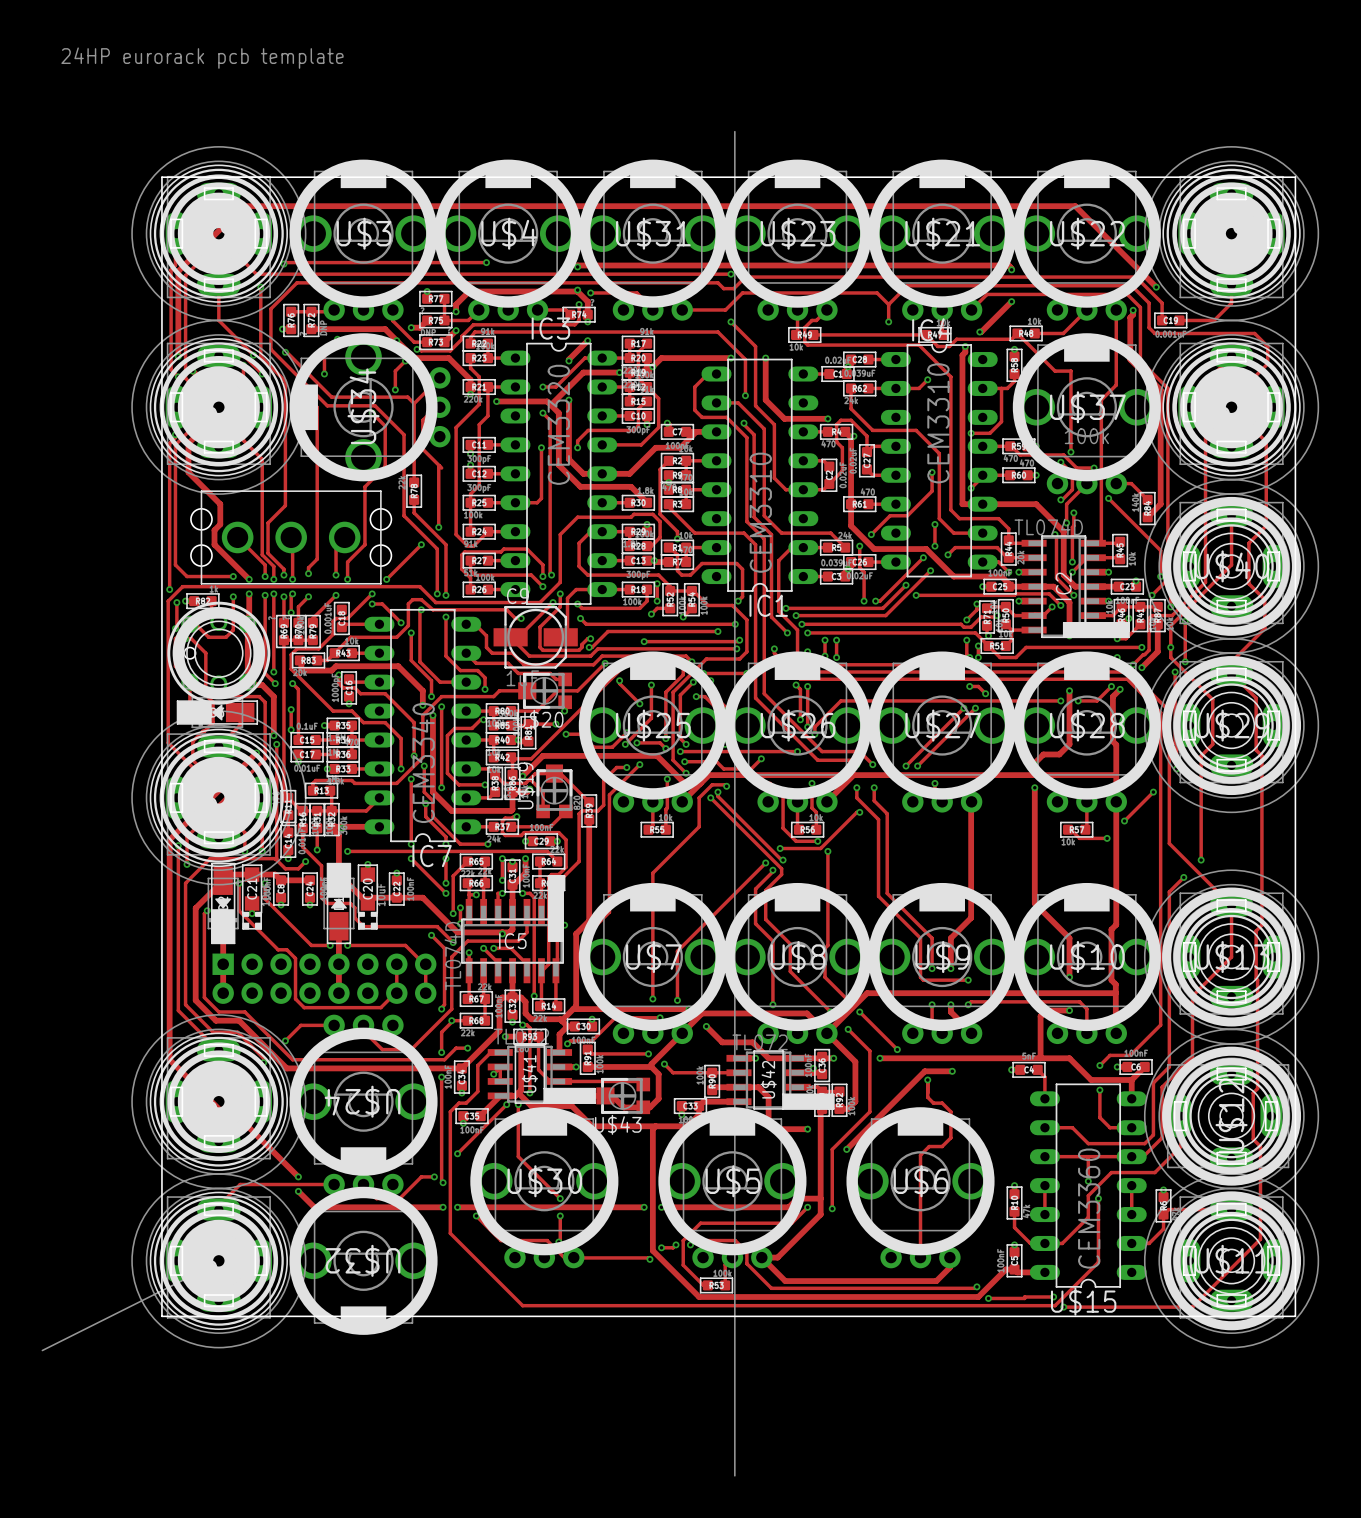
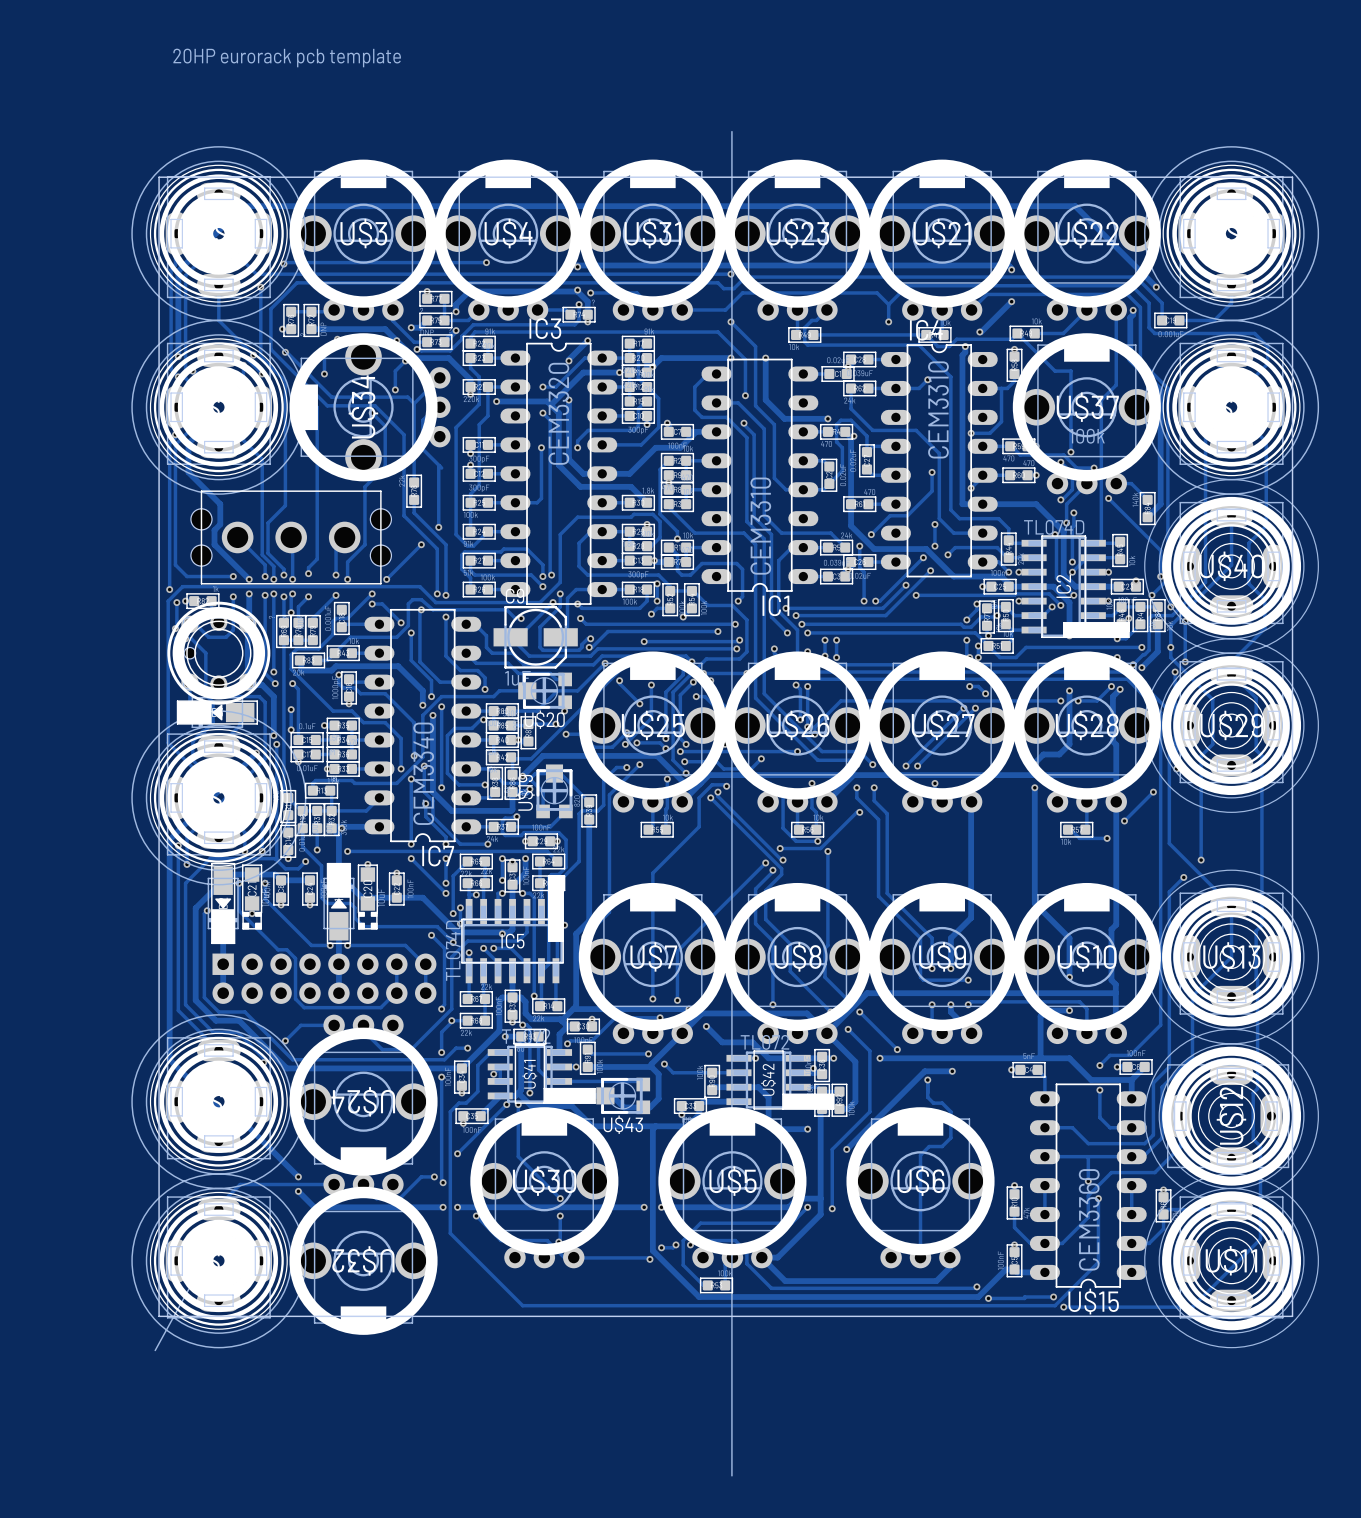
drawing: [41, 130, 1297, 1477] -> none
drawing: none -> [154, 130, 1294, 1477]

